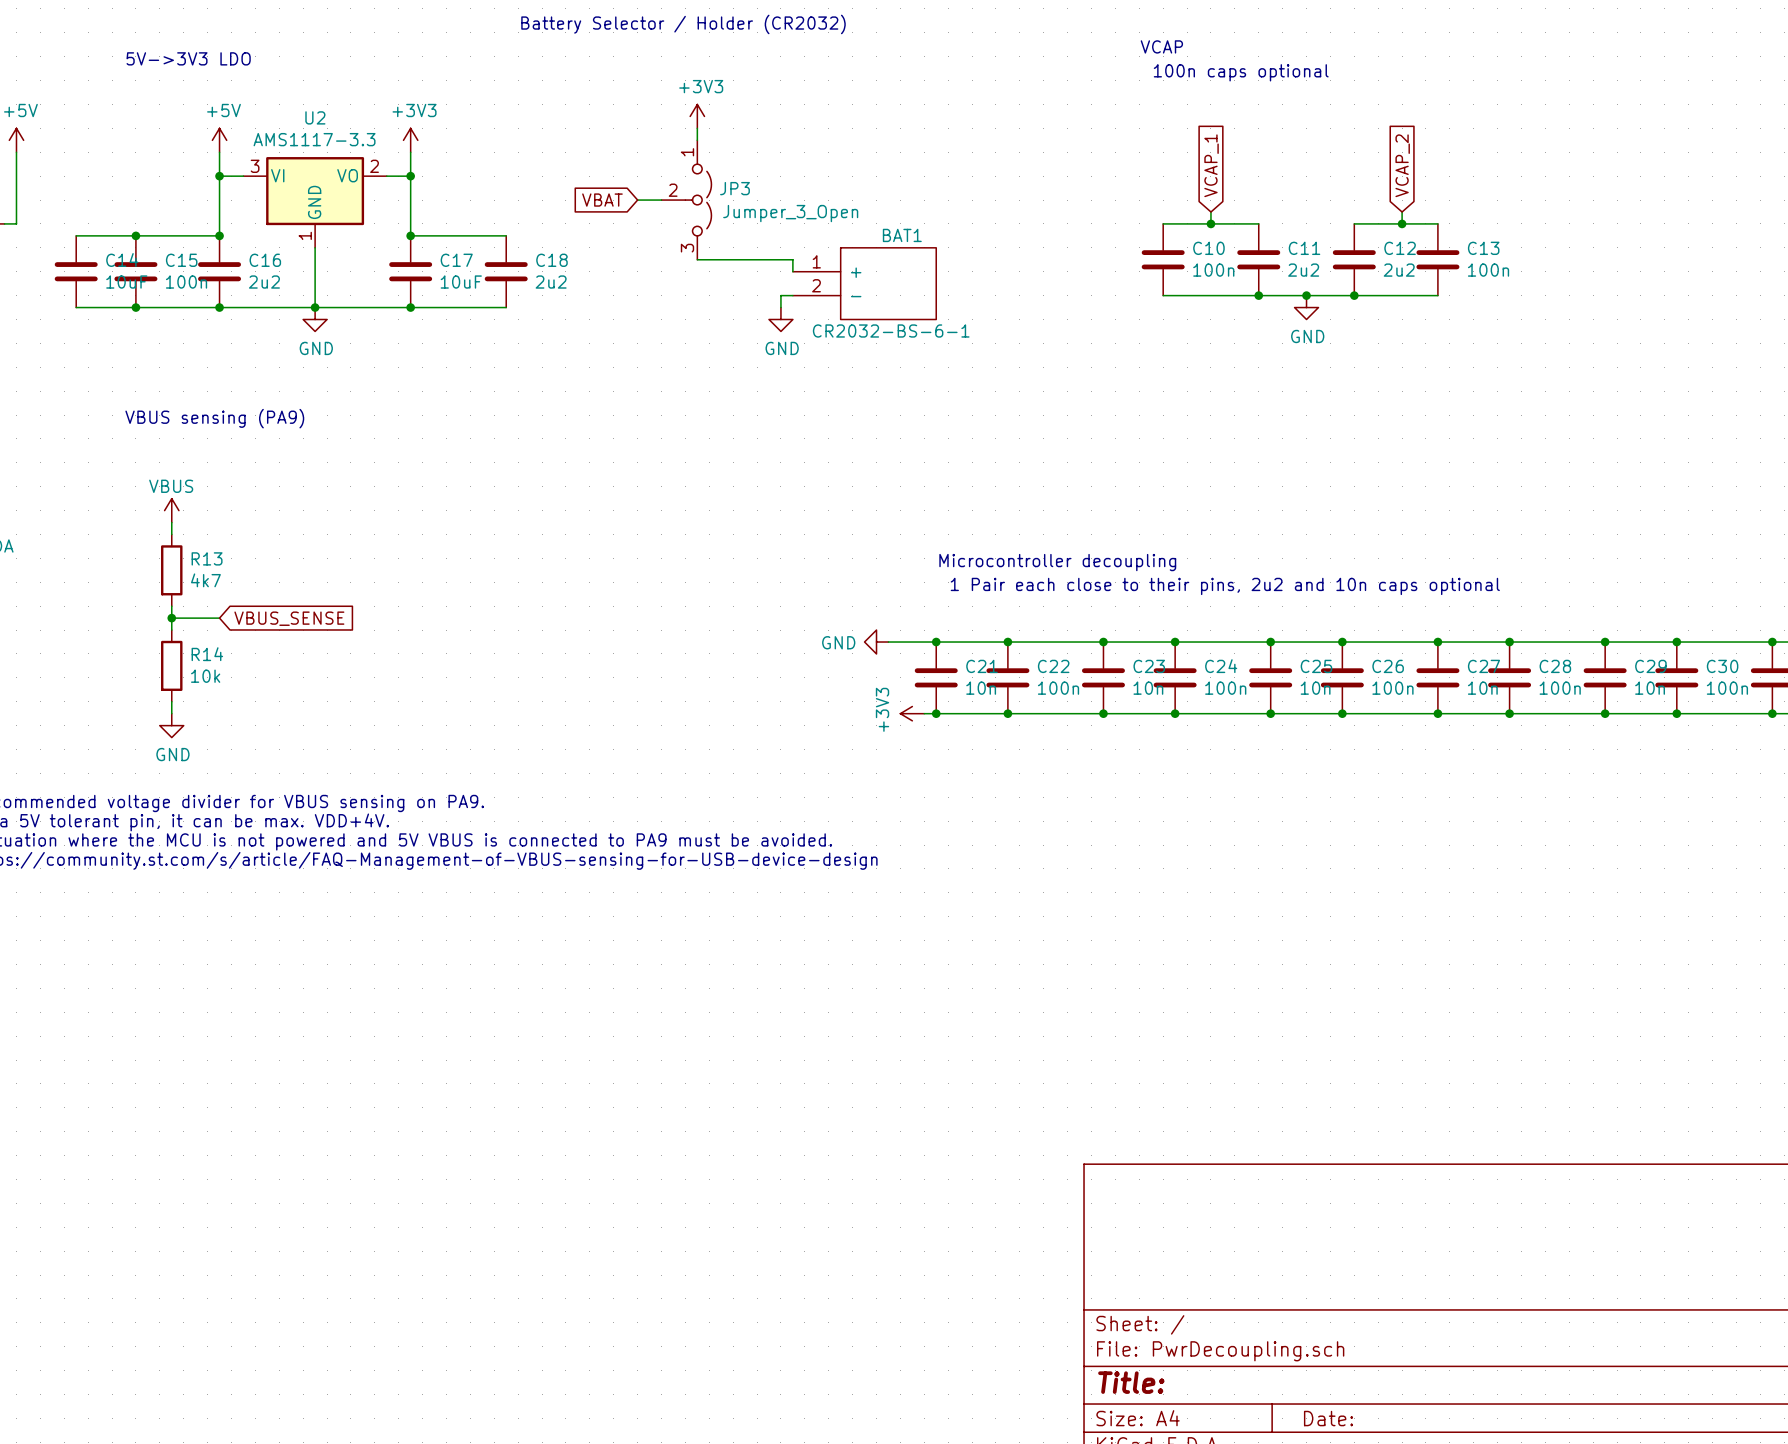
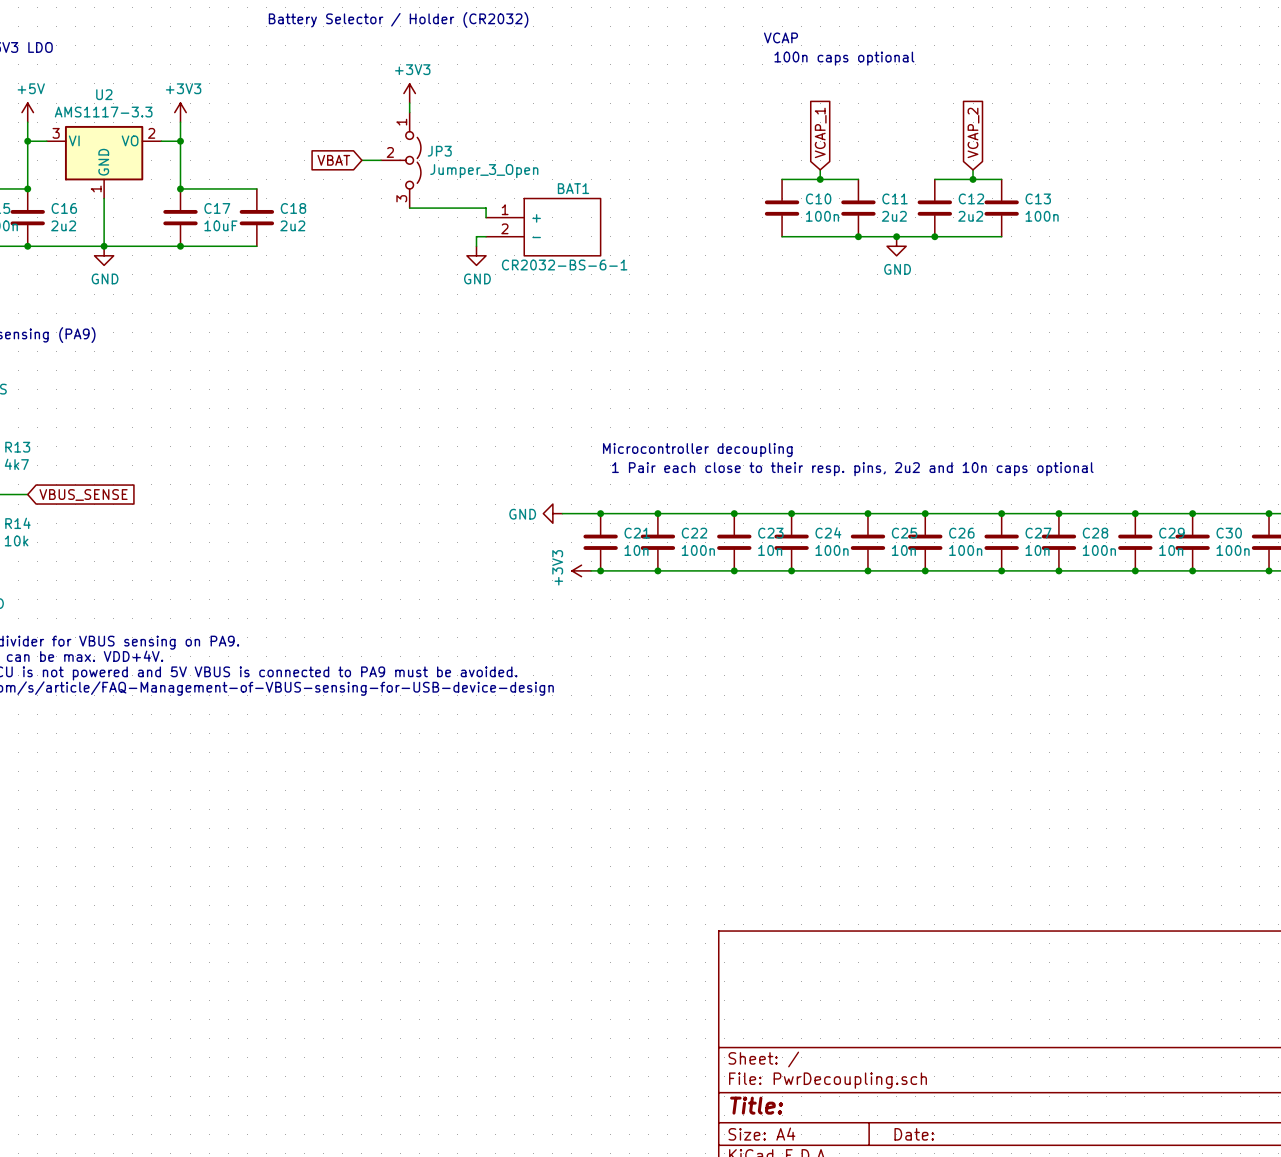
text: 1 Pair each close to their pins, 2u2 and 10n caps optional (1225, 586) -> 1 Pair each close to their resp. pins, 2u2 and 10n caps optional (852, 469)

